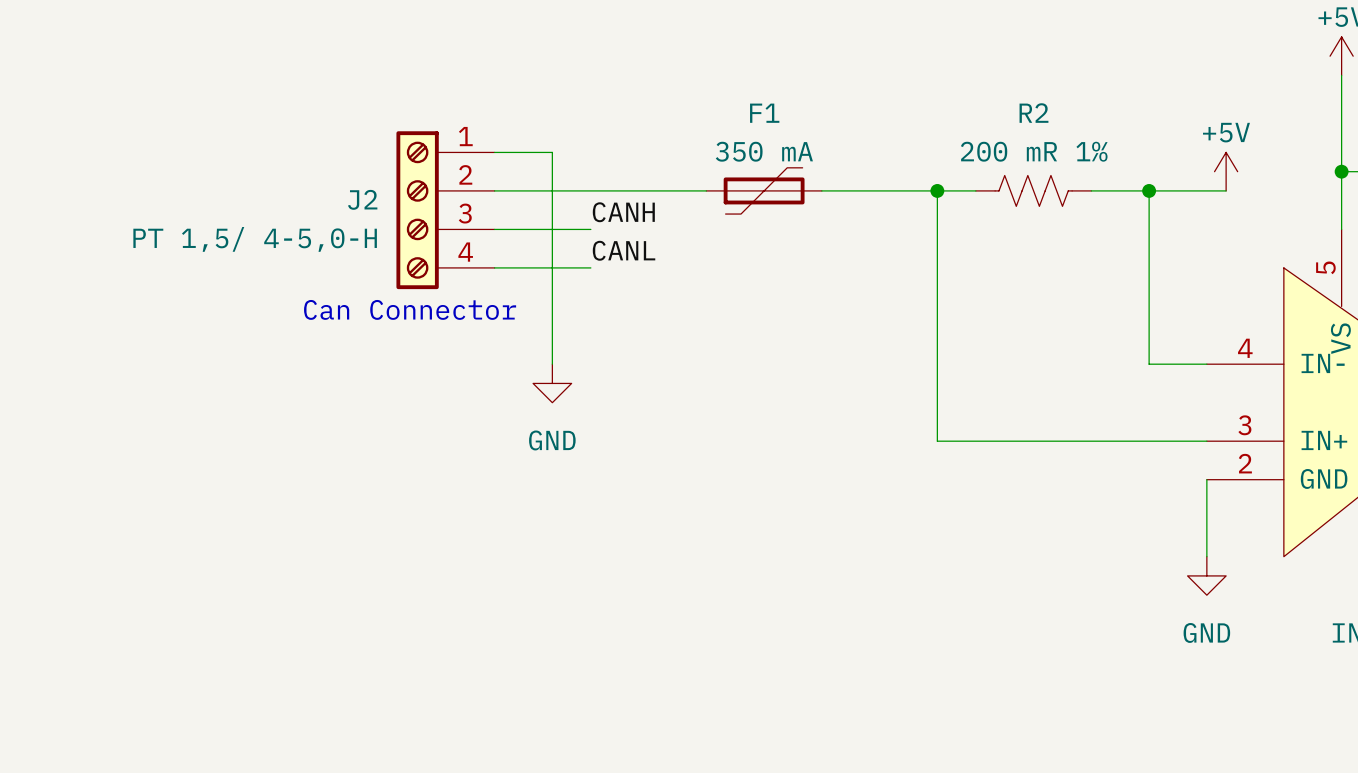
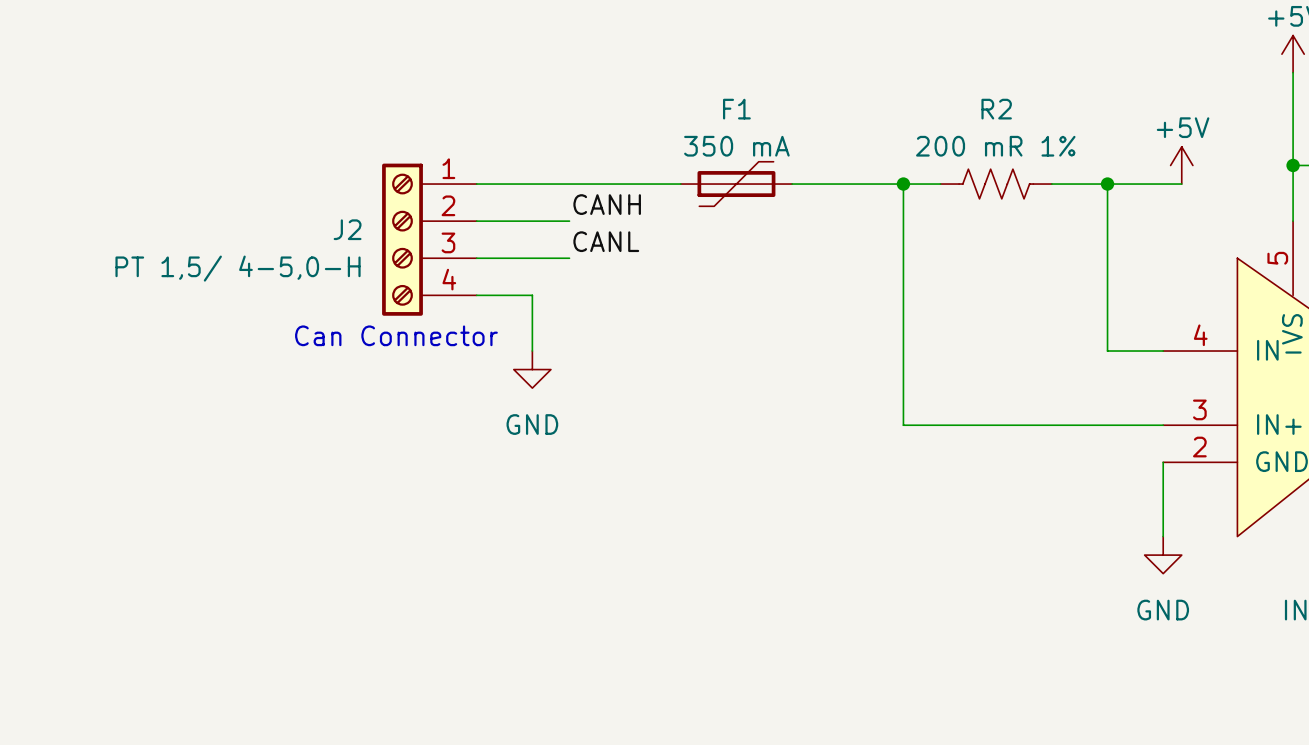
wire: (494, 152) (552, 152) (552, 306) -> (476, 295) (532, 295)
J2 position: (445, 210) -> (429, 239)
text position: Can Connector (410, 309) -> Can Connector (396, 335)

